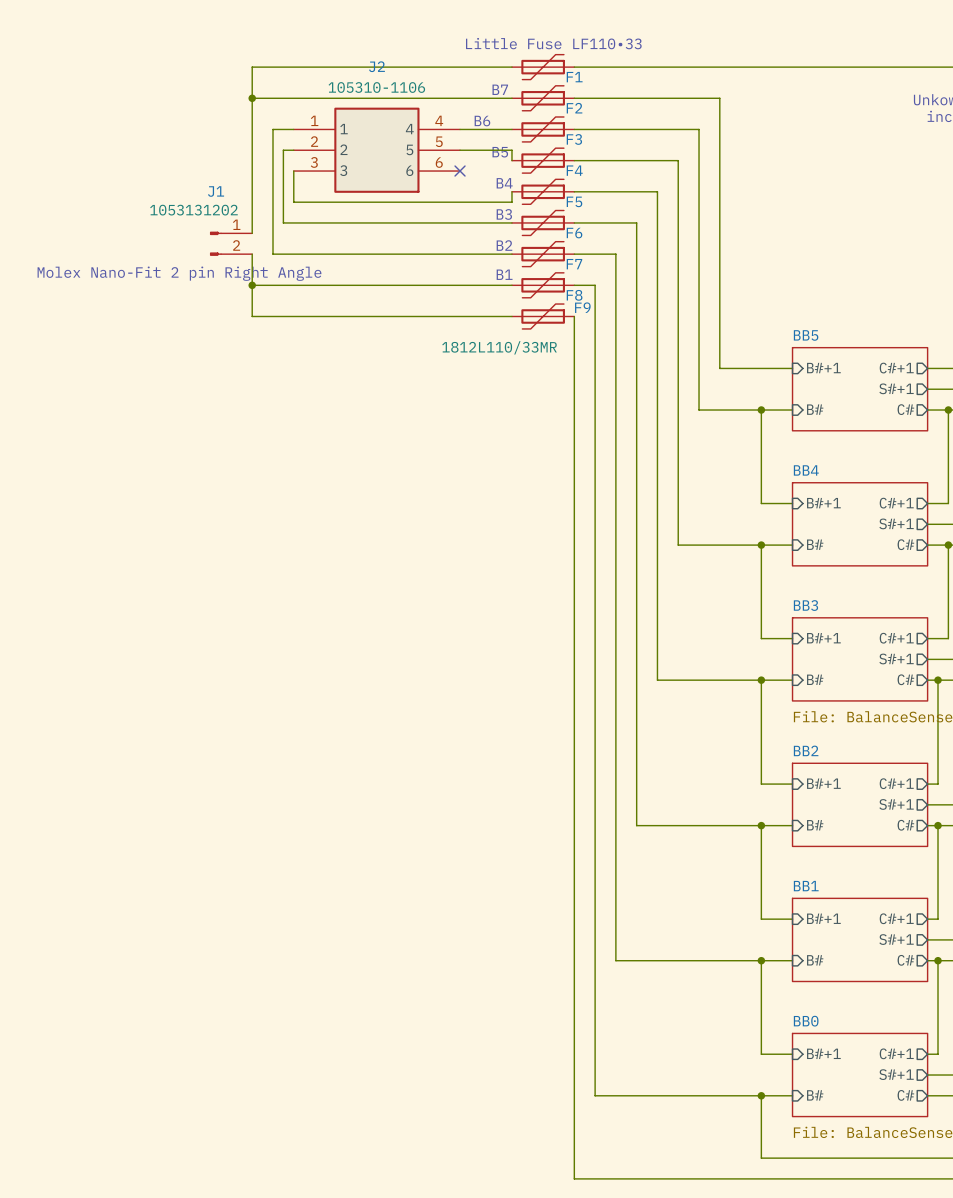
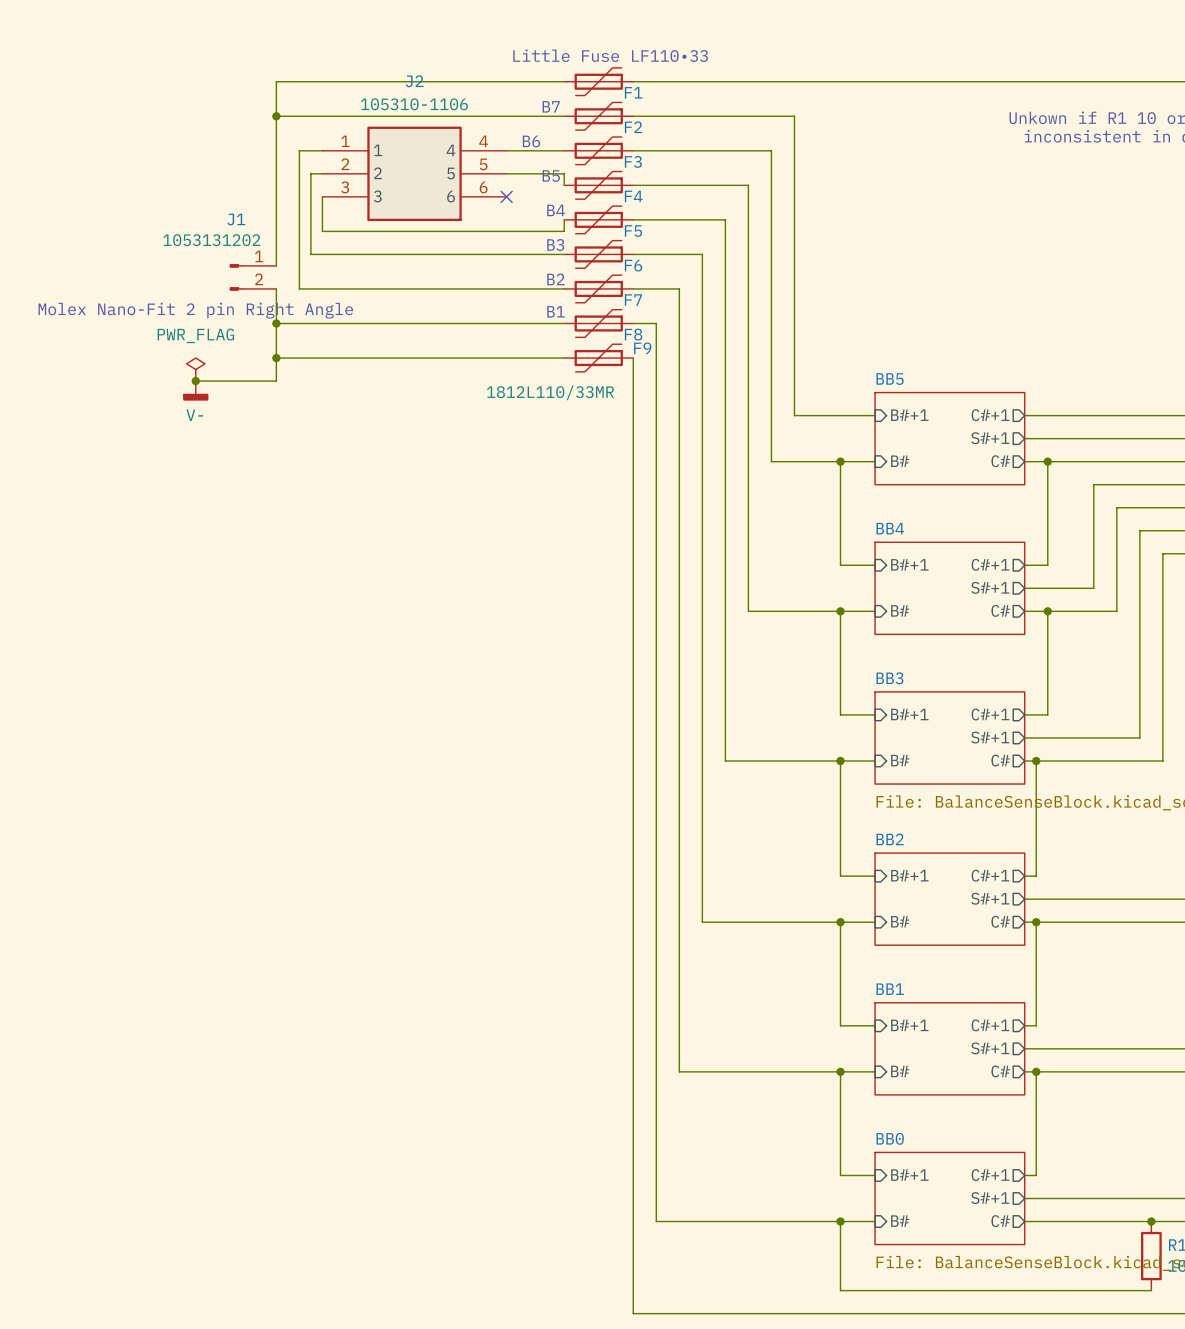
wire: none -> (276, 358) (276, 381) (195, 381)
junction: none -> (276, 358)
power symbol: none -> PWR_FLAG (195, 369)
junction: none -> (195, 381)
power symbol: none -> V- (195, 390)

